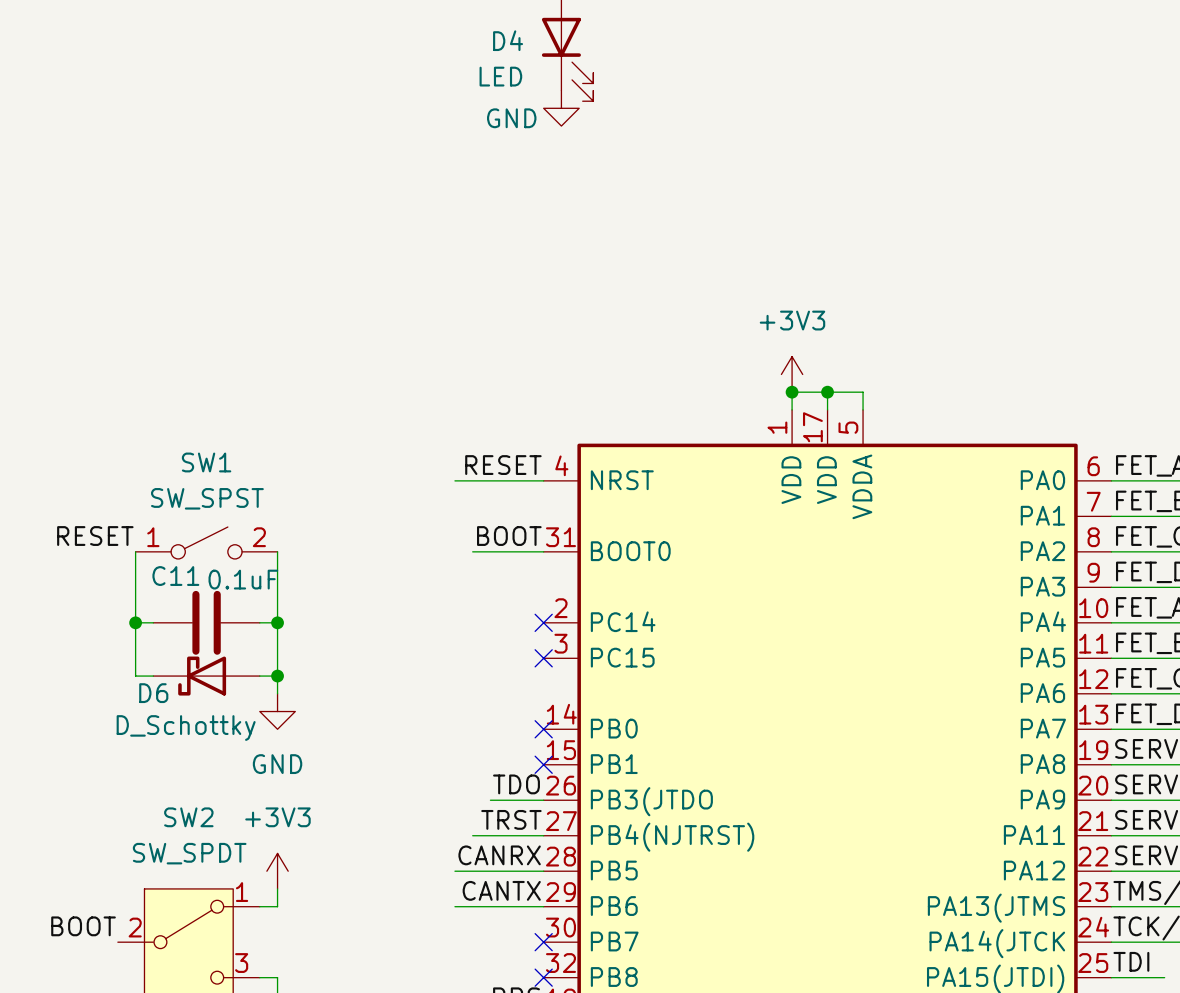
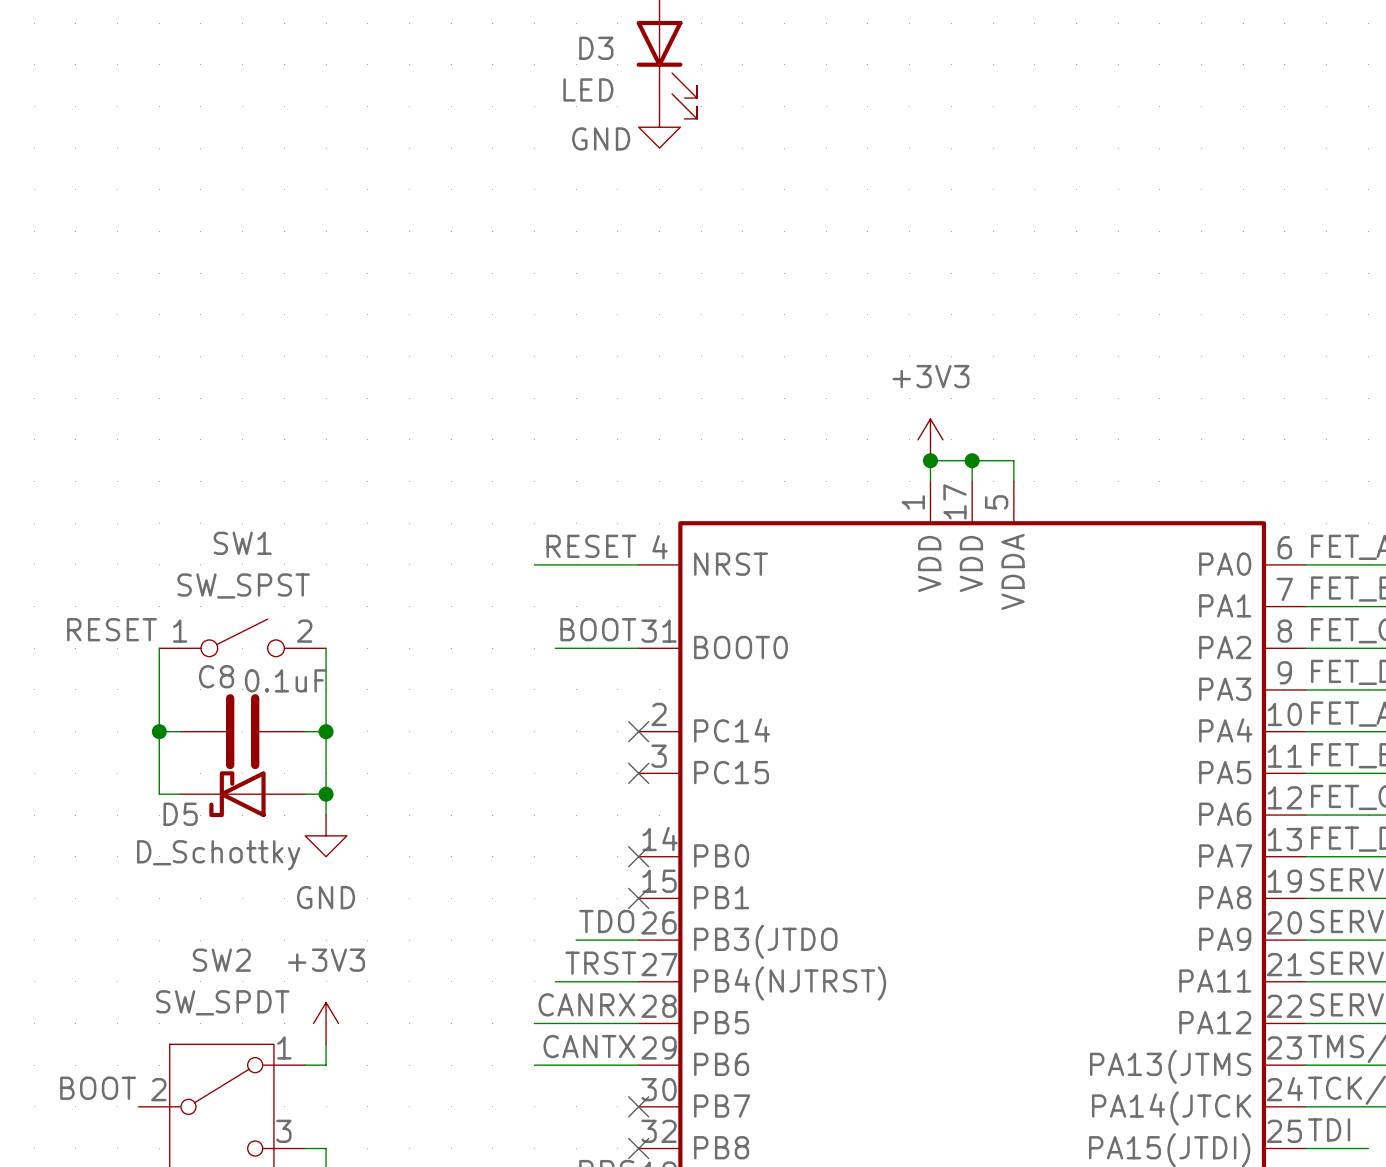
D4 name: D4 (508, 40) -> D3 (596, 48)
C11 name: C11 (175, 576) -> C8 (216, 676)
D6 name: D6 (153, 693) -> D5 (180, 814)

